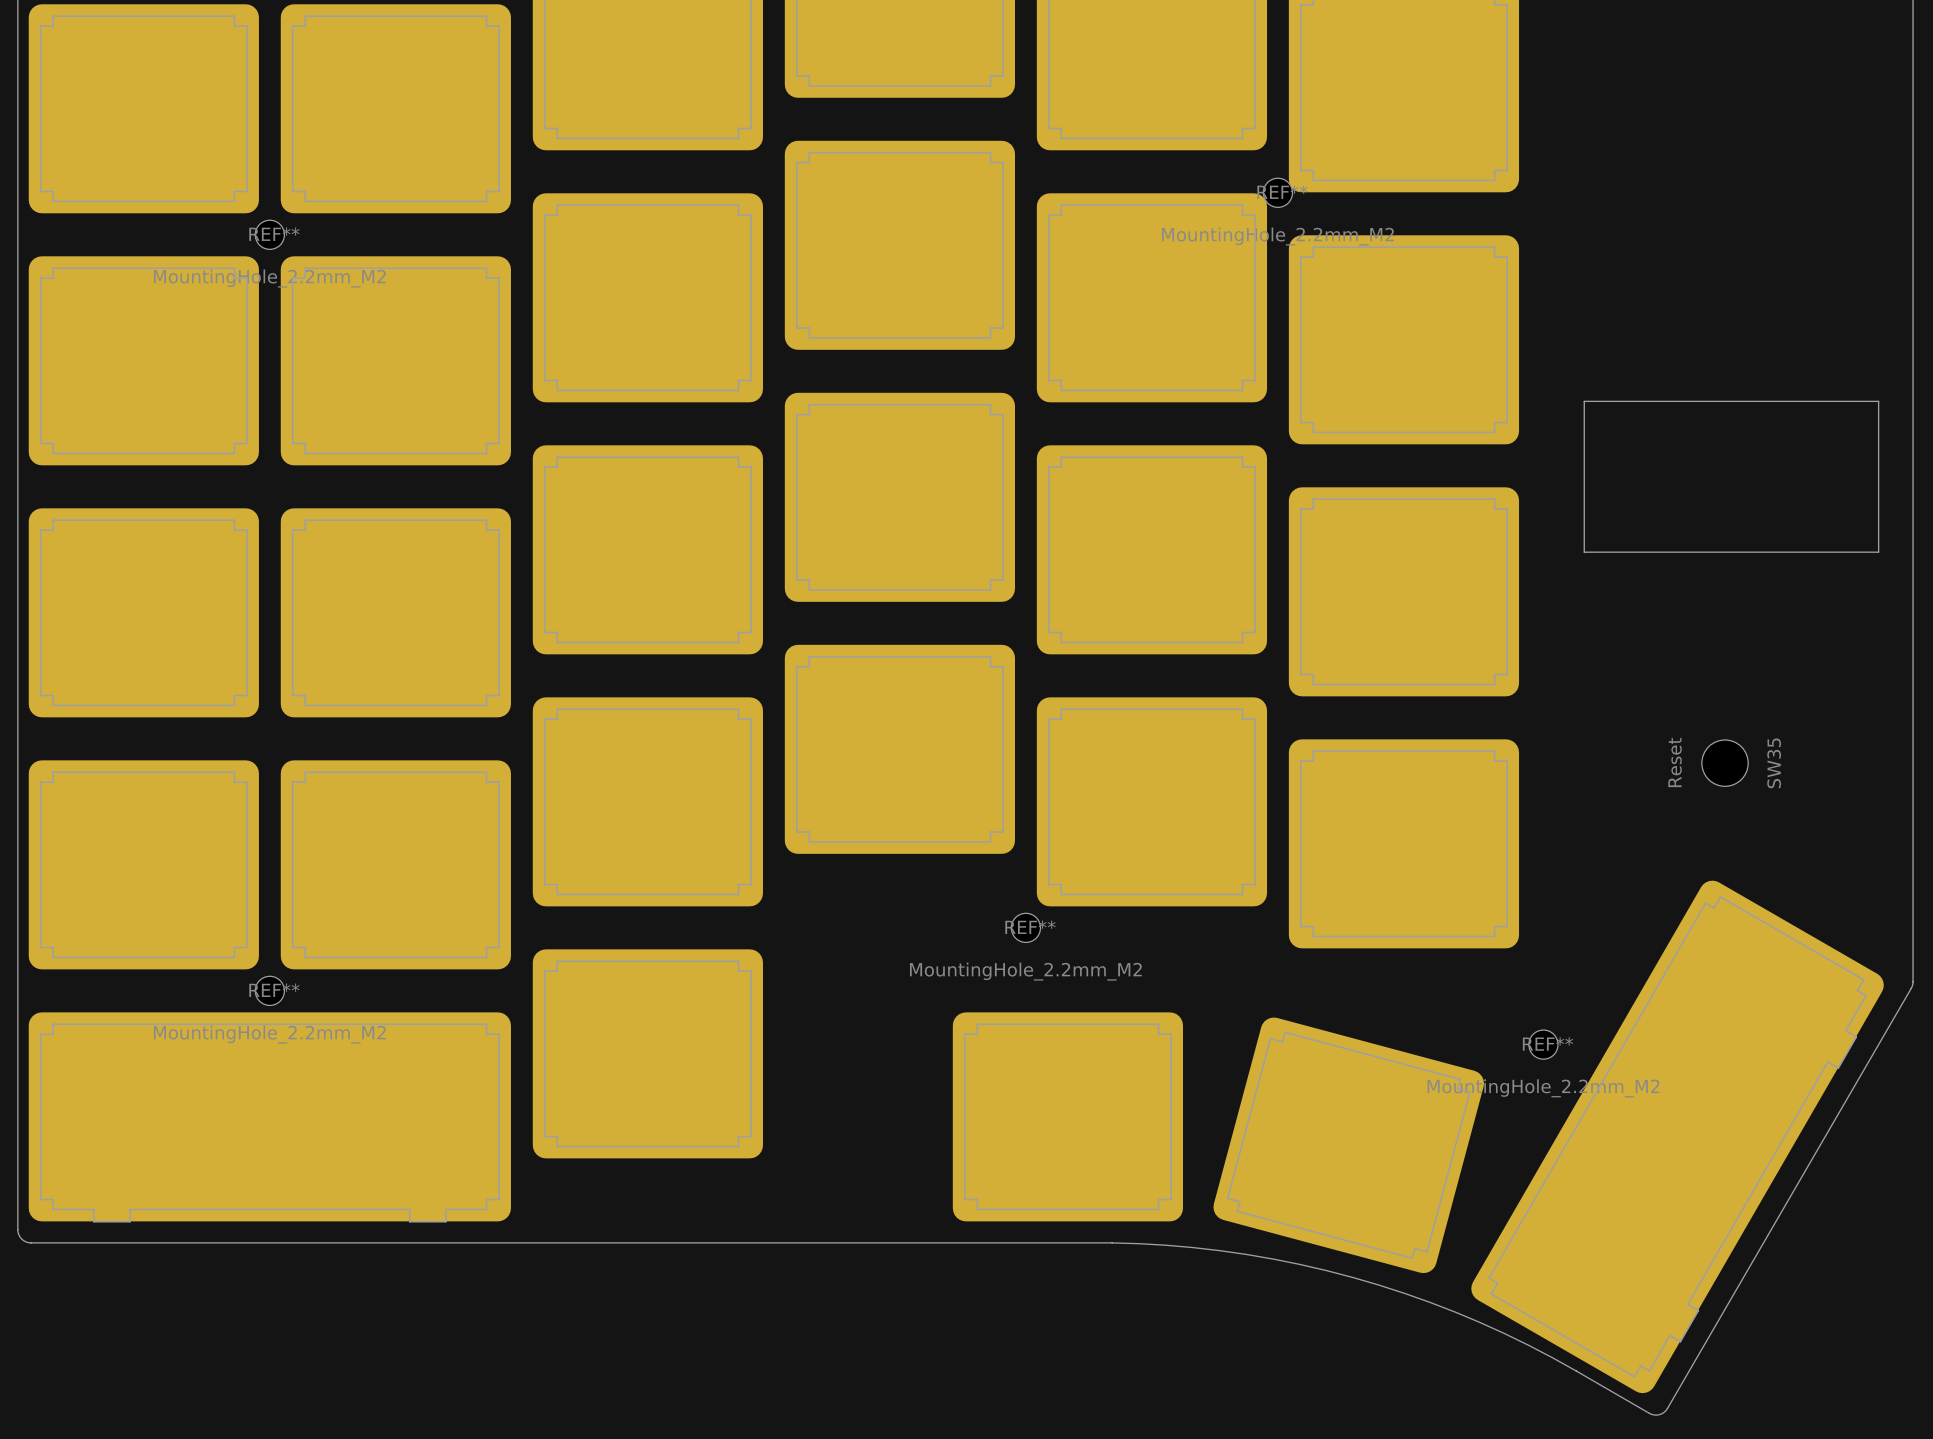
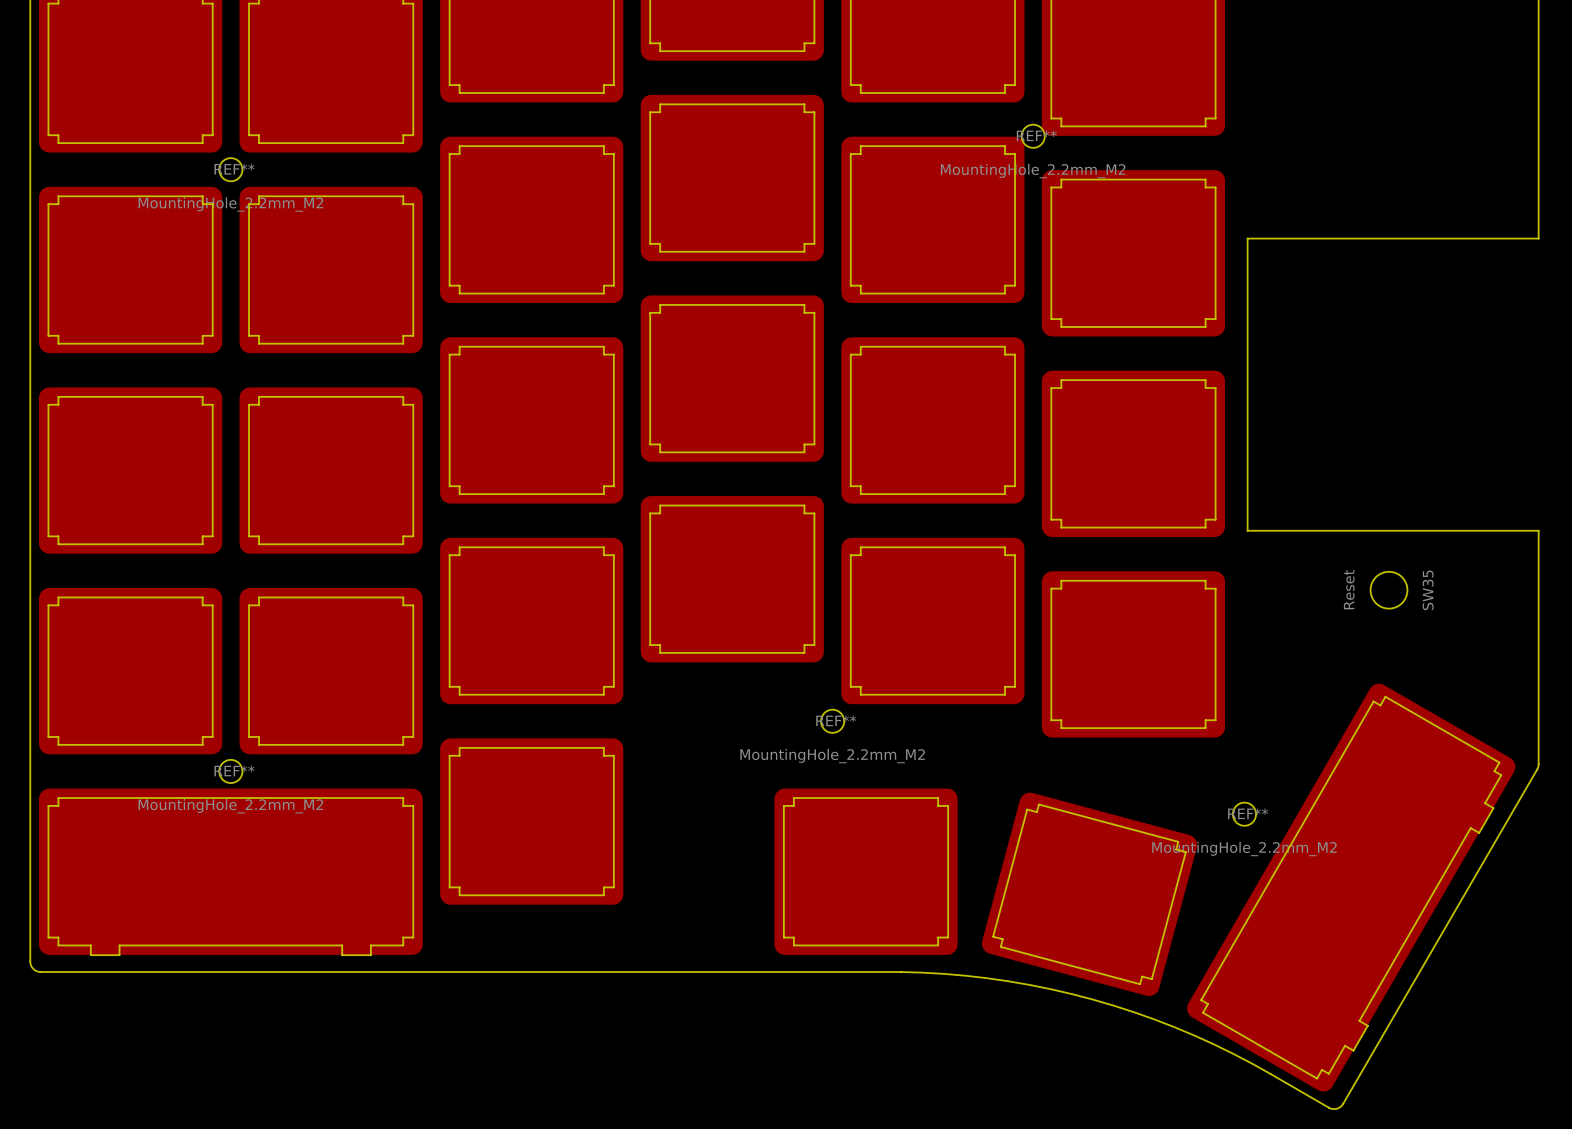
board edge: (1913, 321) (1913, 688) -> (1538, 238) (1247, 238) (1247, 530) (1538, 530)
board edge: (1584, 401) (1878, 401) (1878, 552) (1584, 552) (1584, 401) -> none

